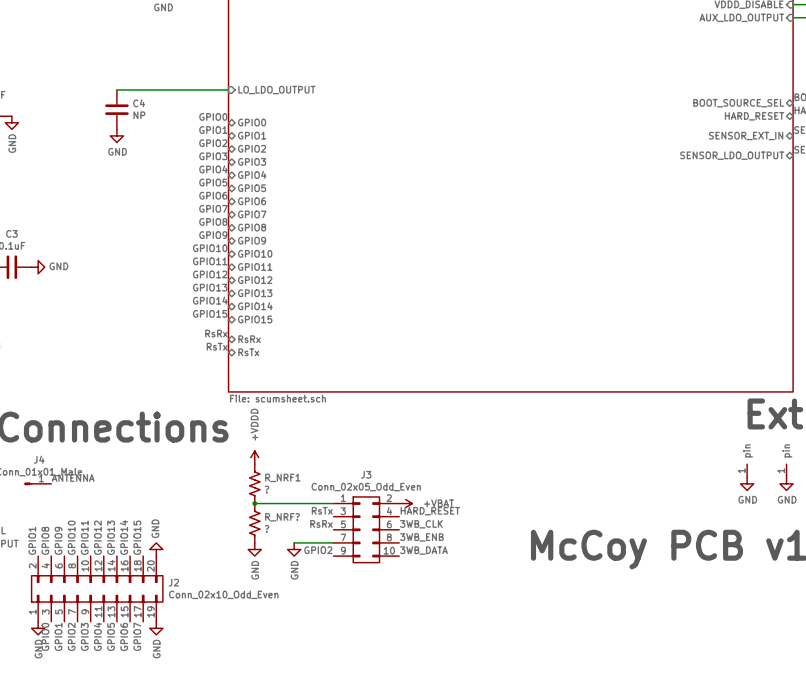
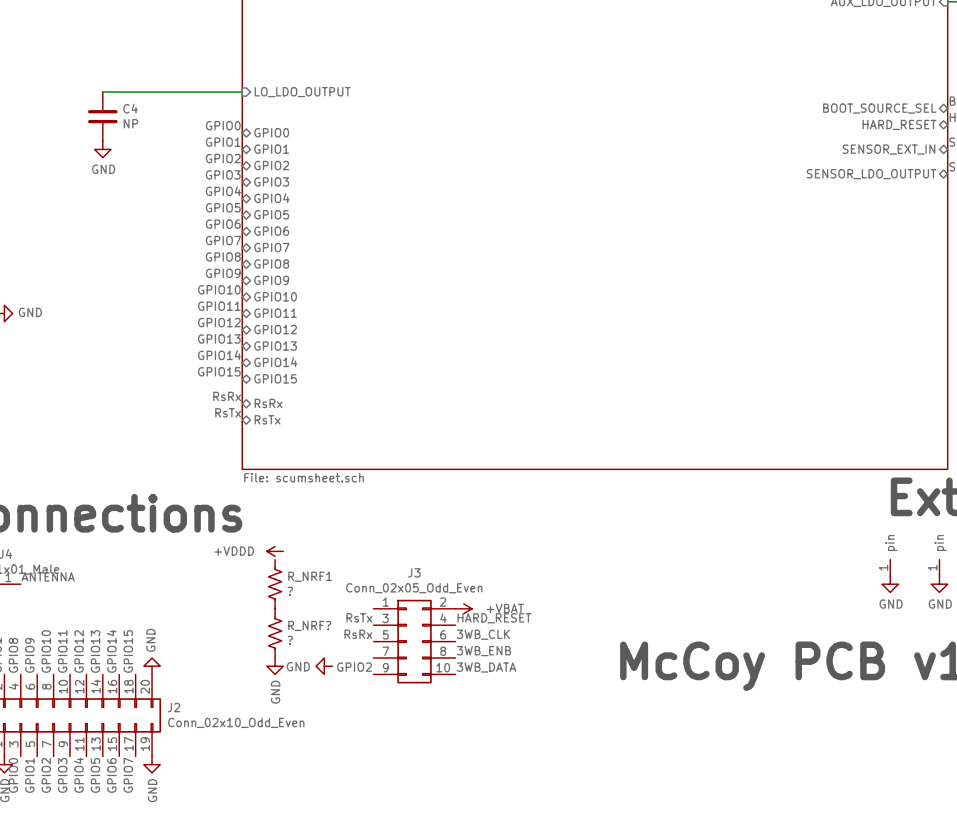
power symbol rotation: 0° (254, 457) -> 90° counterclockwise (275, 551)
wire: (254, 503) (333, 503) -> none
junction: (254, 503) -> none
wire: (294, 542) (333, 542) -> none
power symbol rotation: 0° (294, 549) -> 90° clockwise (324, 666)

